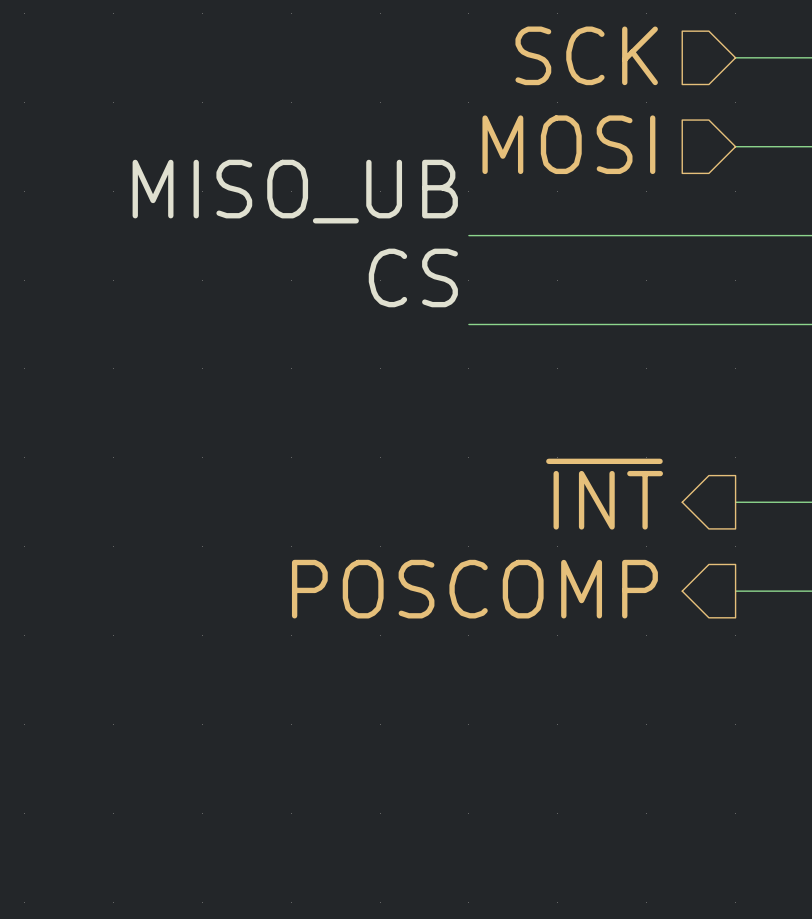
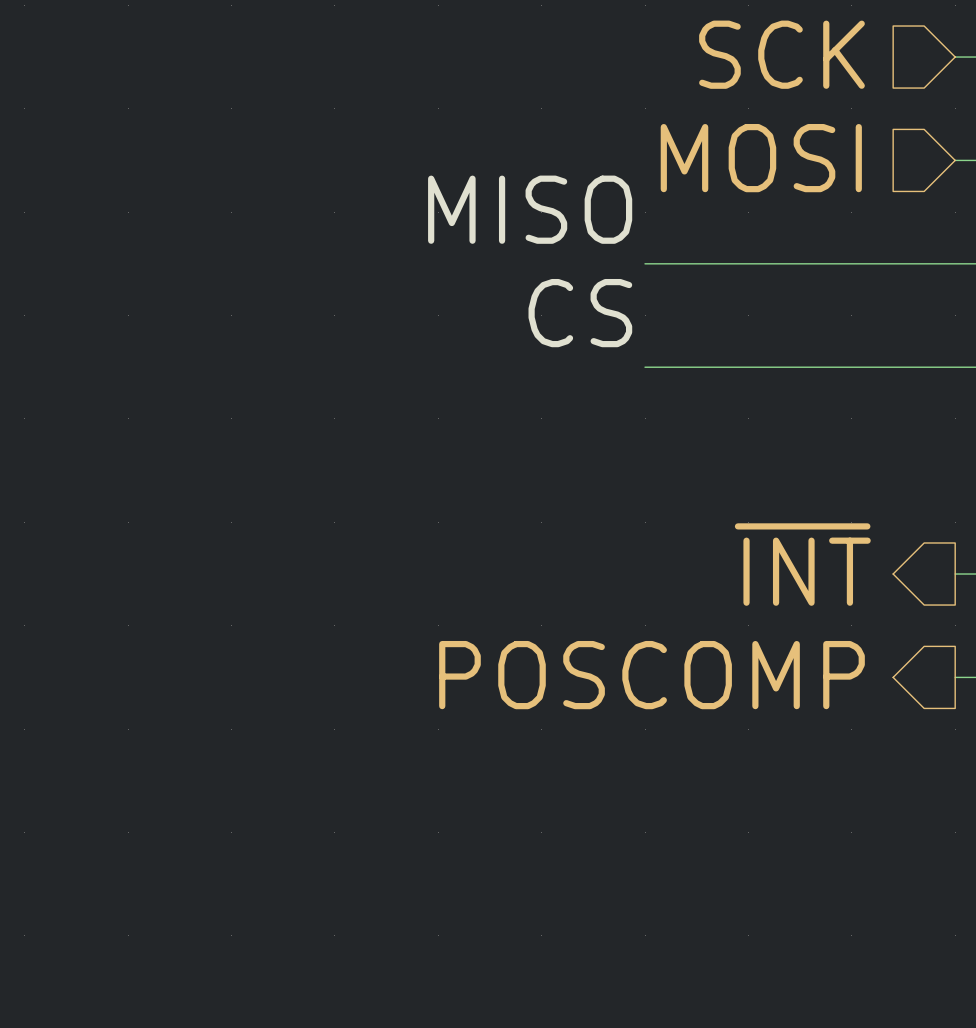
label: MISO_UB (295, 191) -> MISO (530, 209)

